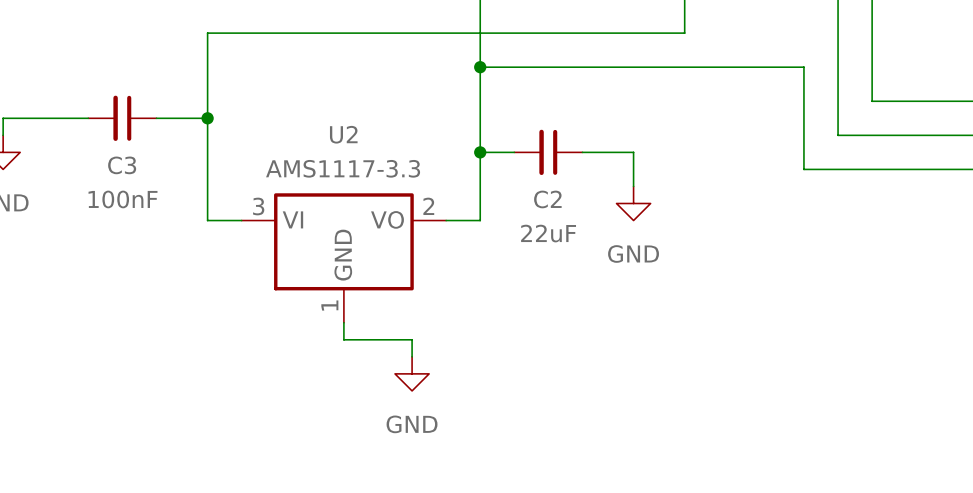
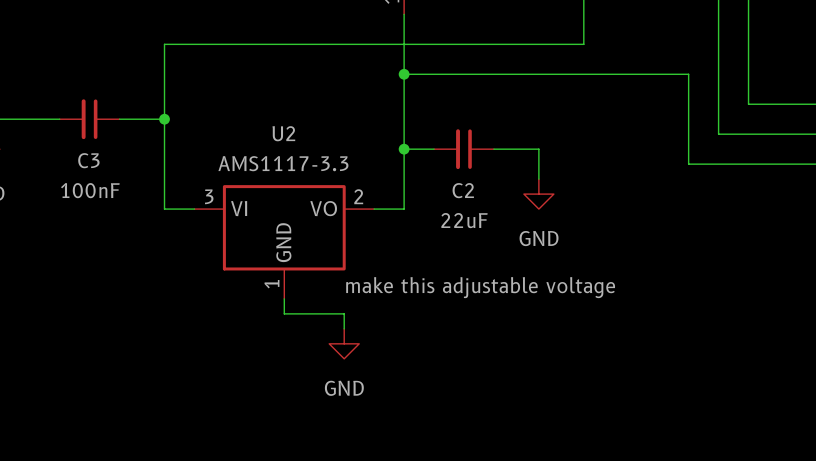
label: none -> make this adjustable voltage (480, 287)

